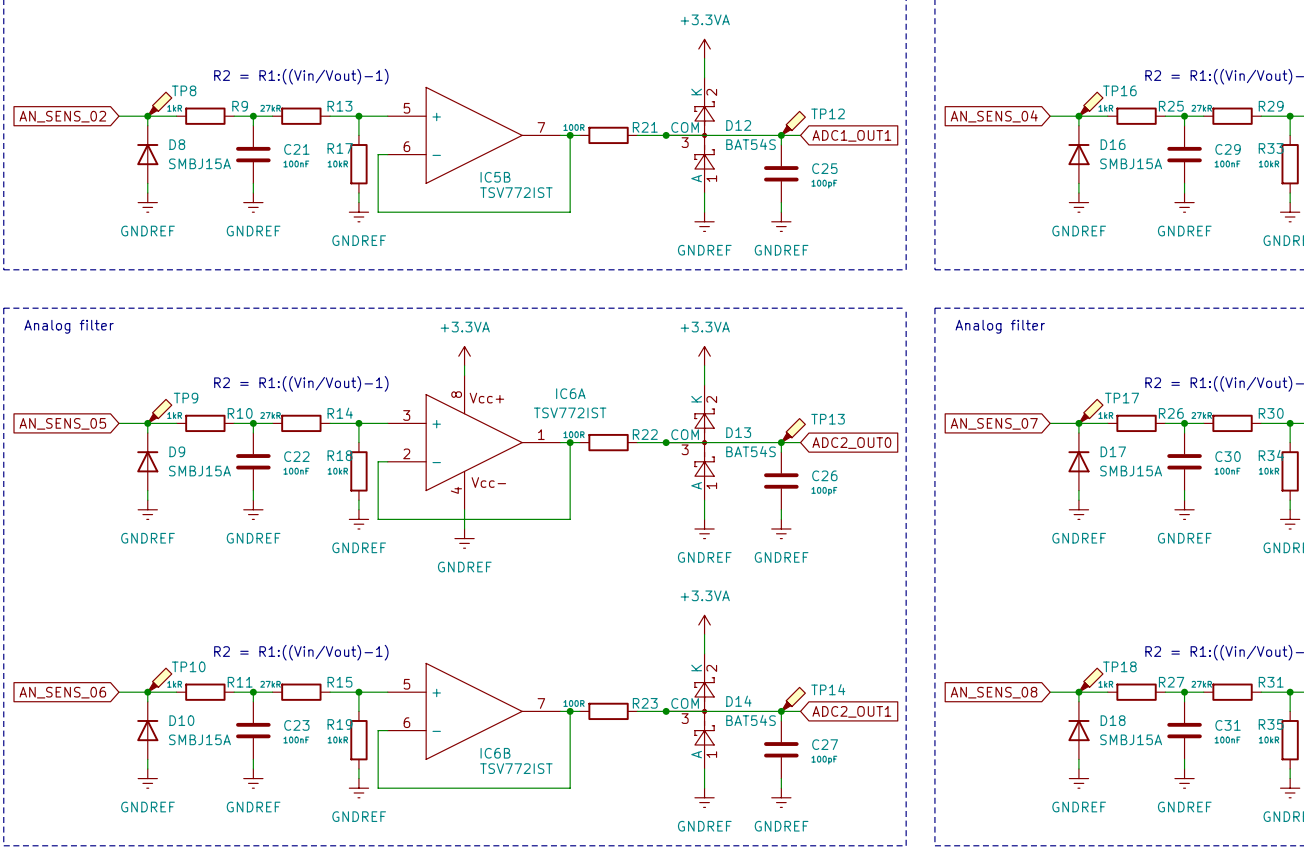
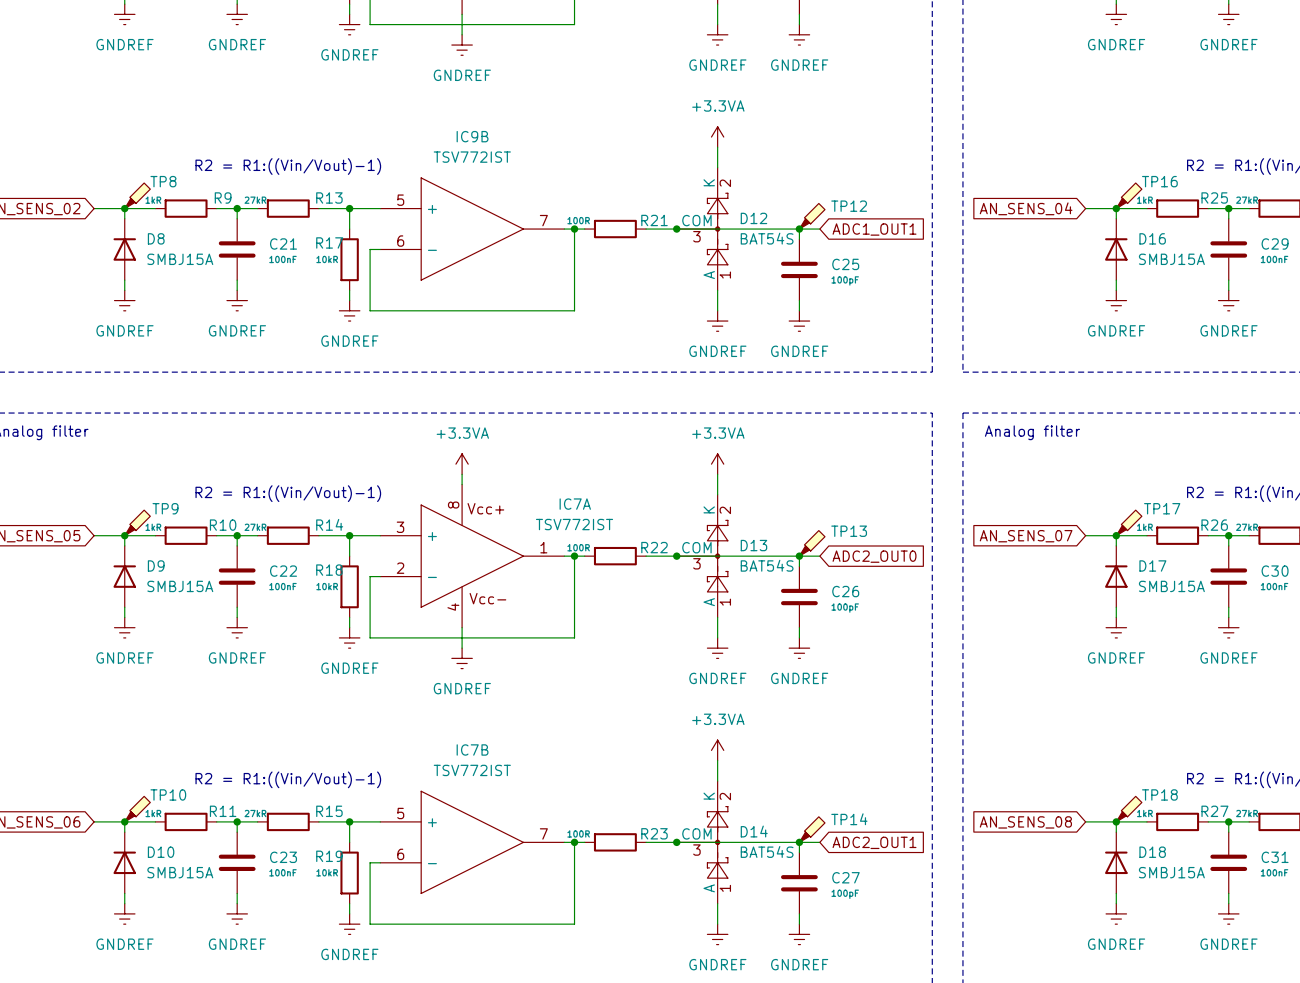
IC5B name: IC5B (495, 177) -> IC9B (472, 136)
IC5B value position: TSV772IST (516, 192) -> TSV772IST (472, 157)
IC6A name: IC6A (570, 393) -> IC7A (575, 504)
IC6B name: IC6B (495, 753) -> IC7B (472, 749)
IC6B value position: TSV772IST (516, 768) -> TSV772IST (472, 770)

